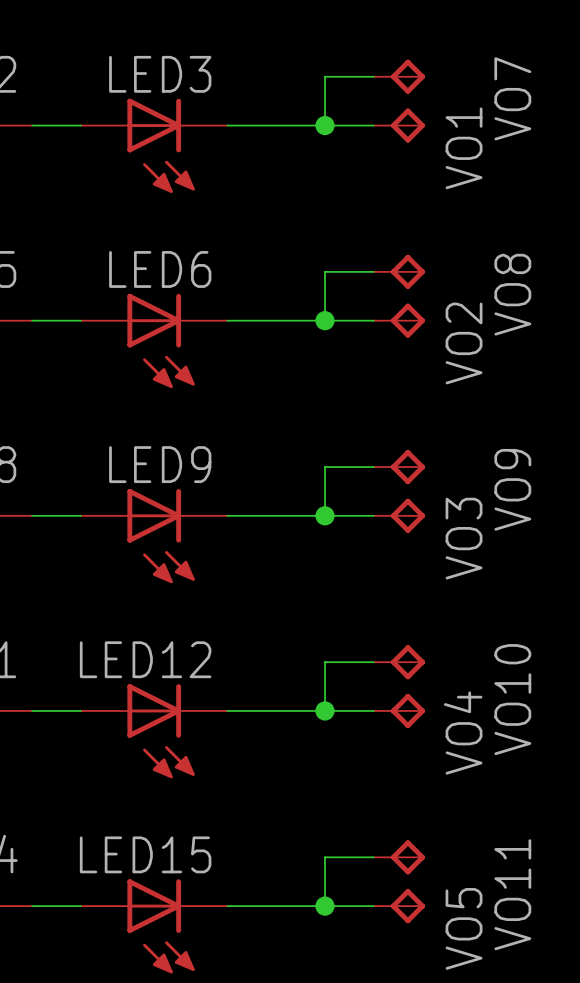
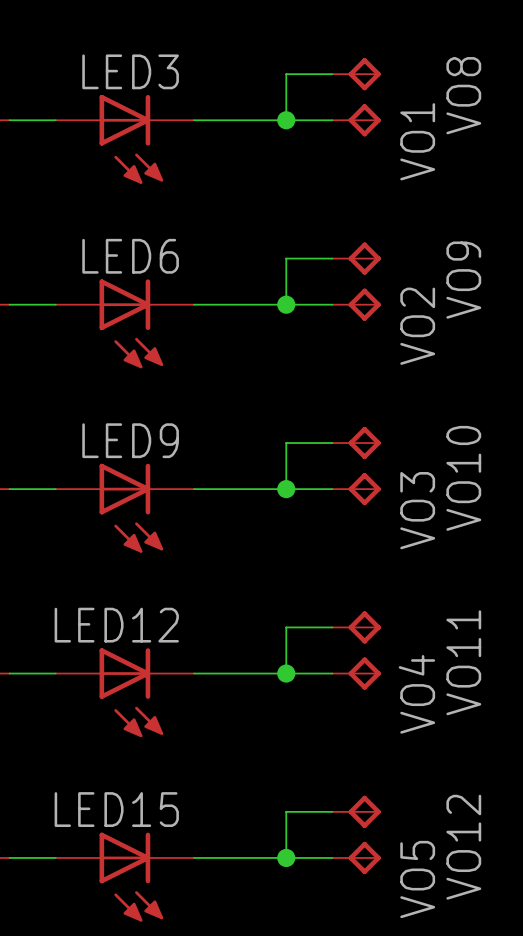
VO7 name: VO7 (512, 98) -> VO8 (463, 95)
VO8 name: VO8 (512, 294) -> VO9 (463, 280)
VO9 name: VO9 (512, 489) -> VO10 (463, 478)
VO10 name: VO10 (512, 699) -> VO11 (463, 662)
VO11 name: VO11 (512, 894) -> VO12 (463, 847)

